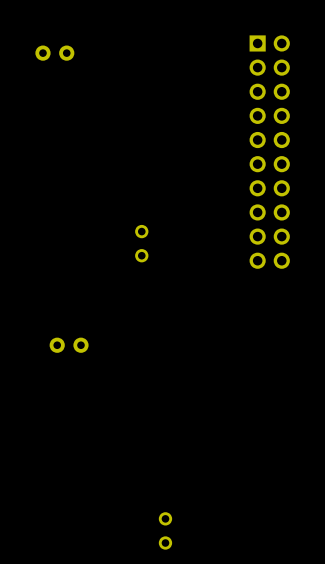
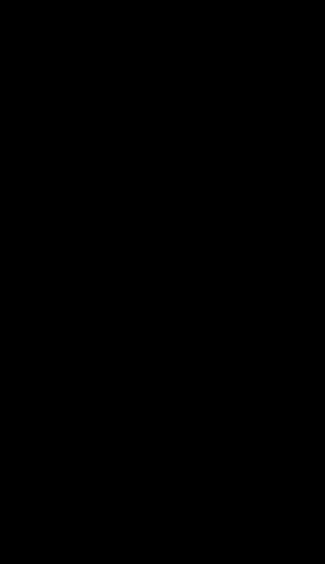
part: (54, 53) -> none
part: (269, 152) -> none
part: (141, 243) -> none
part: (69, 345) -> none
part: (165, 530) -> none

